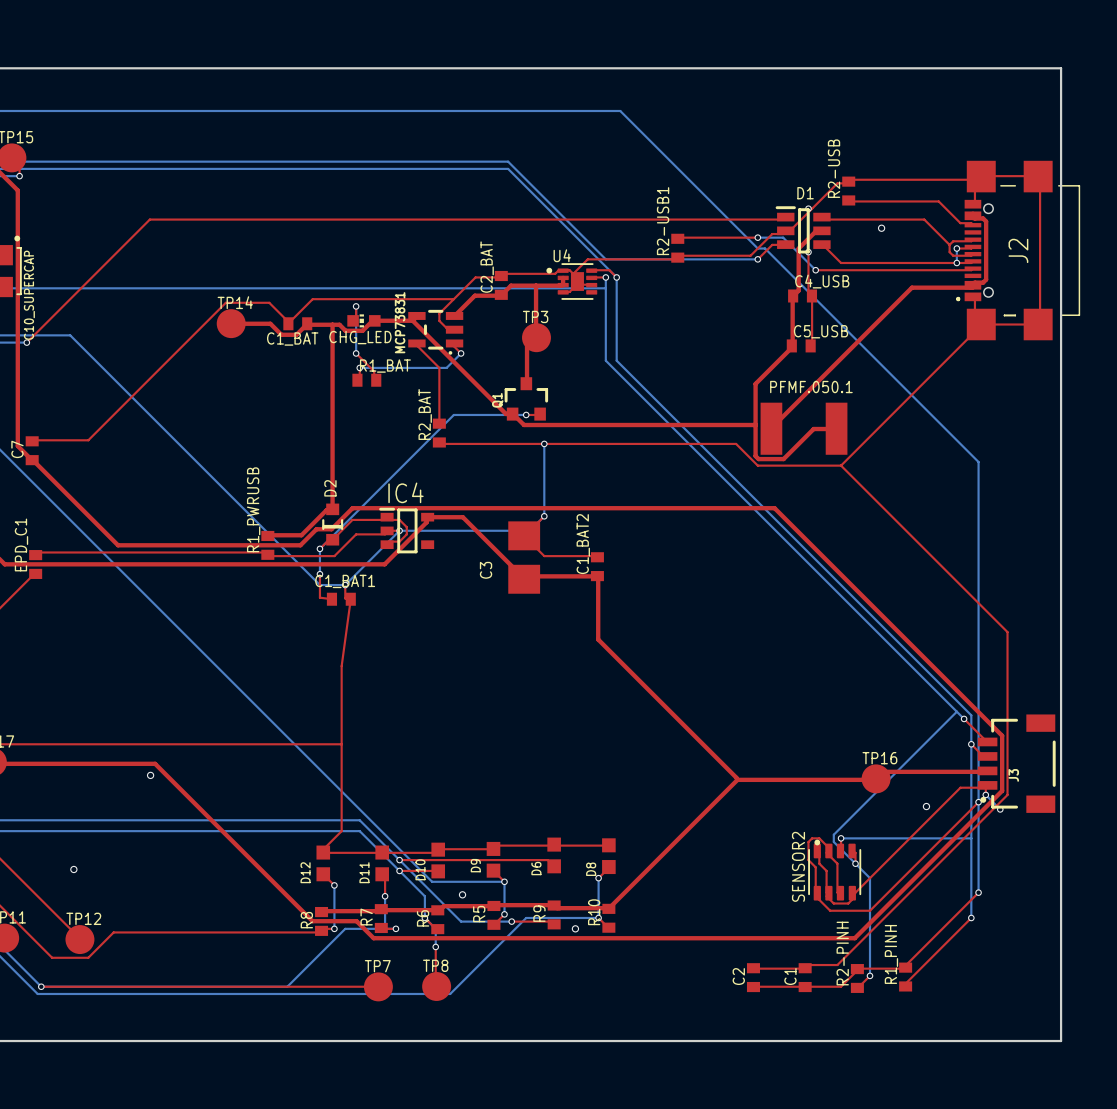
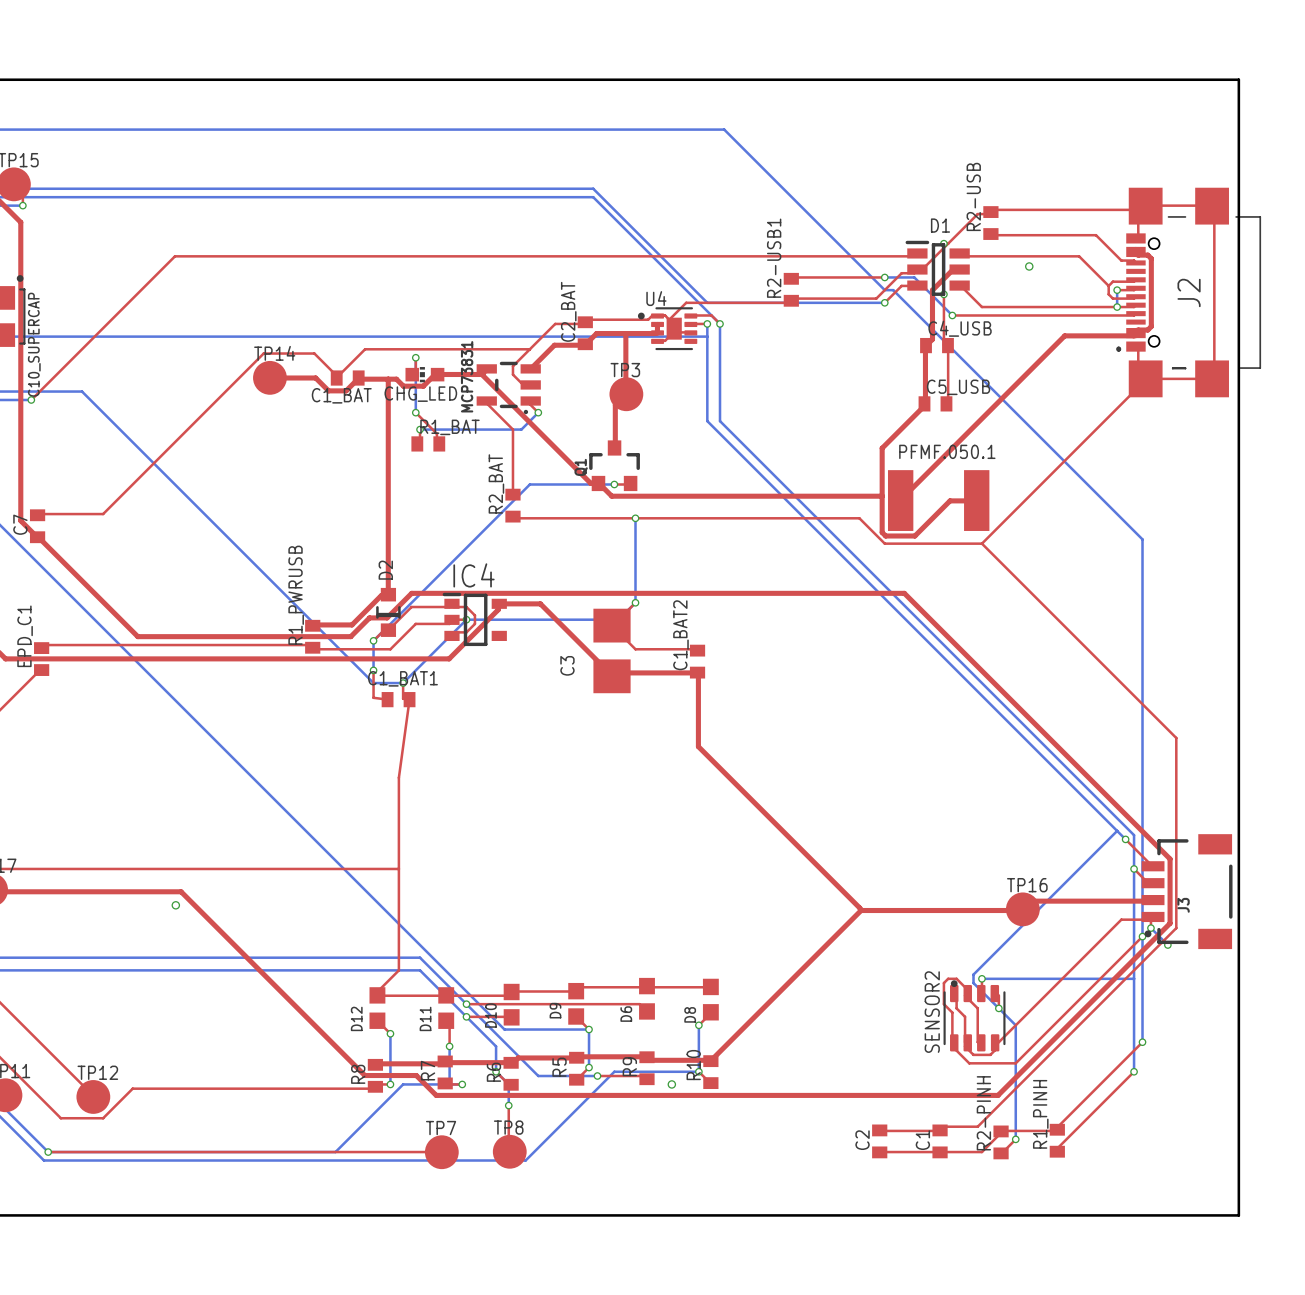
via: (926, 806) -> none
via: (73, 869) -> none
via: (462, 894) -> none

